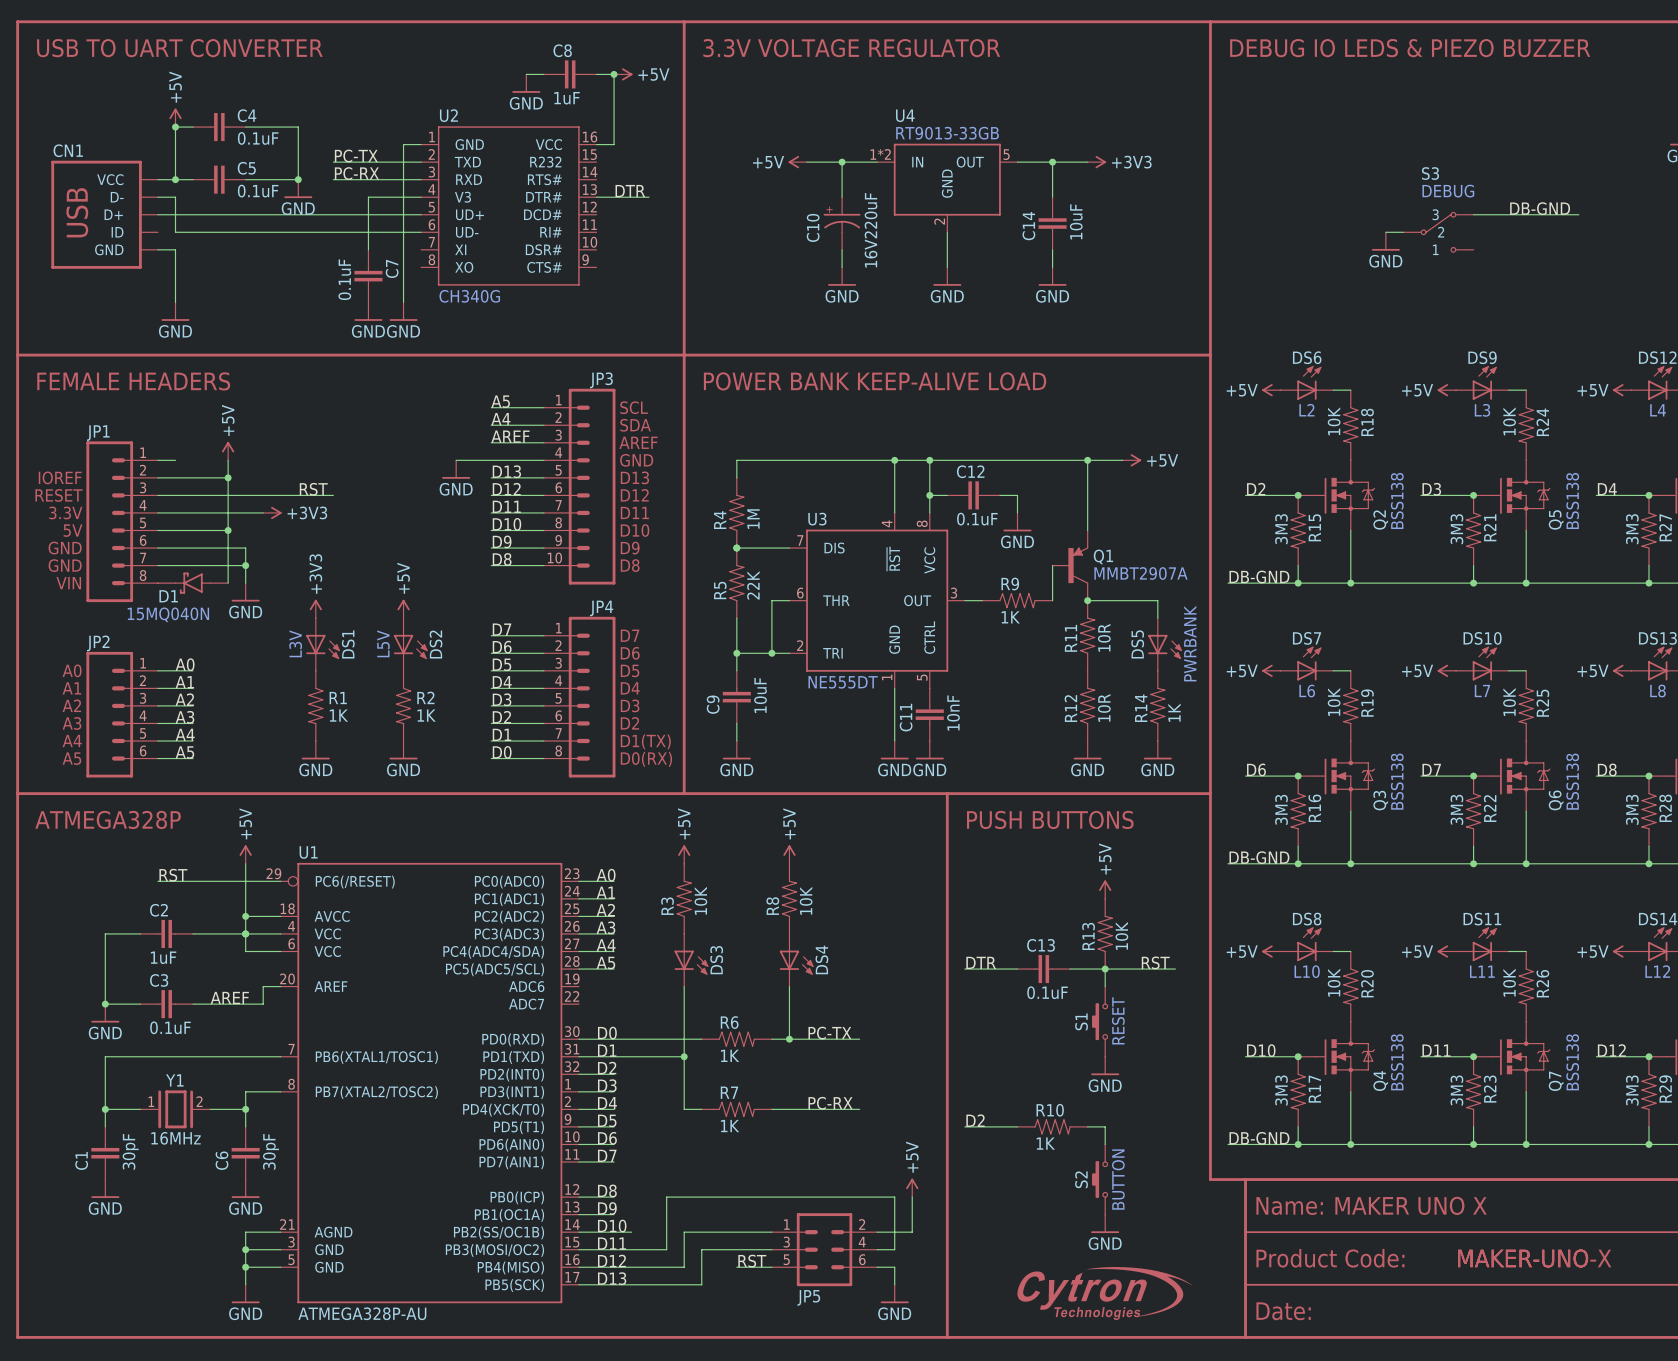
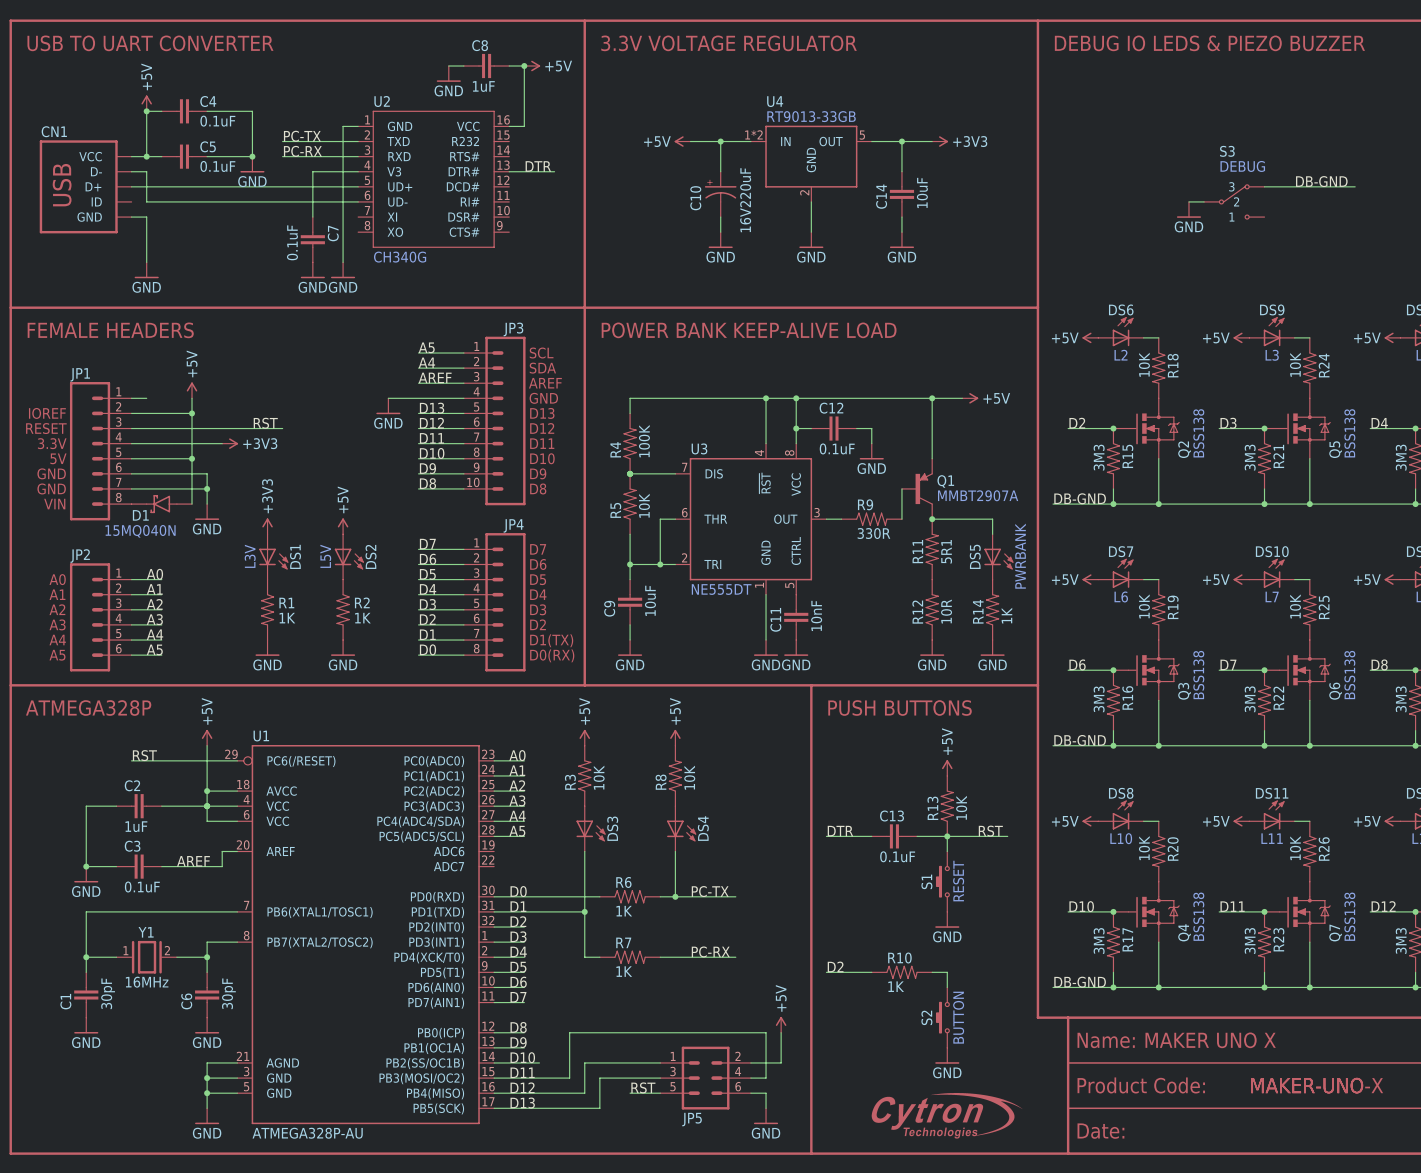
R4 value: 1M (753, 519) -> 100K (644, 441)
R5 value: 22K (753, 585) -> 10K (644, 505)
R9 value: 1K (1010, 617) -> 330R (873, 533)
R11 value: 10R (1104, 637) -> 5R1 (946, 551)

